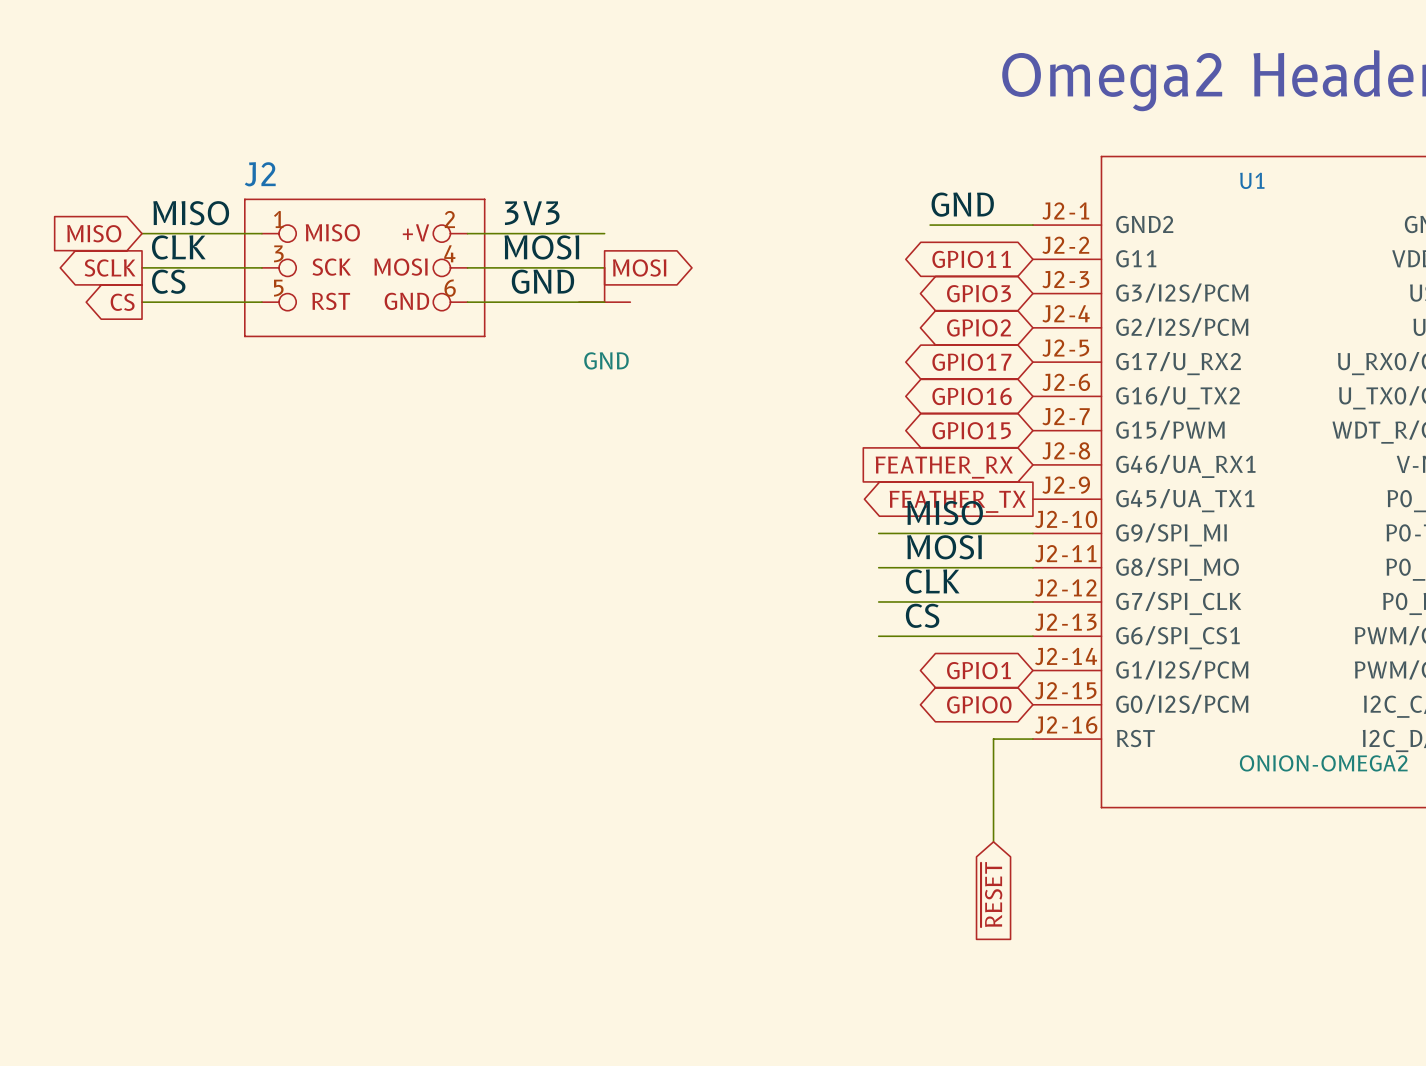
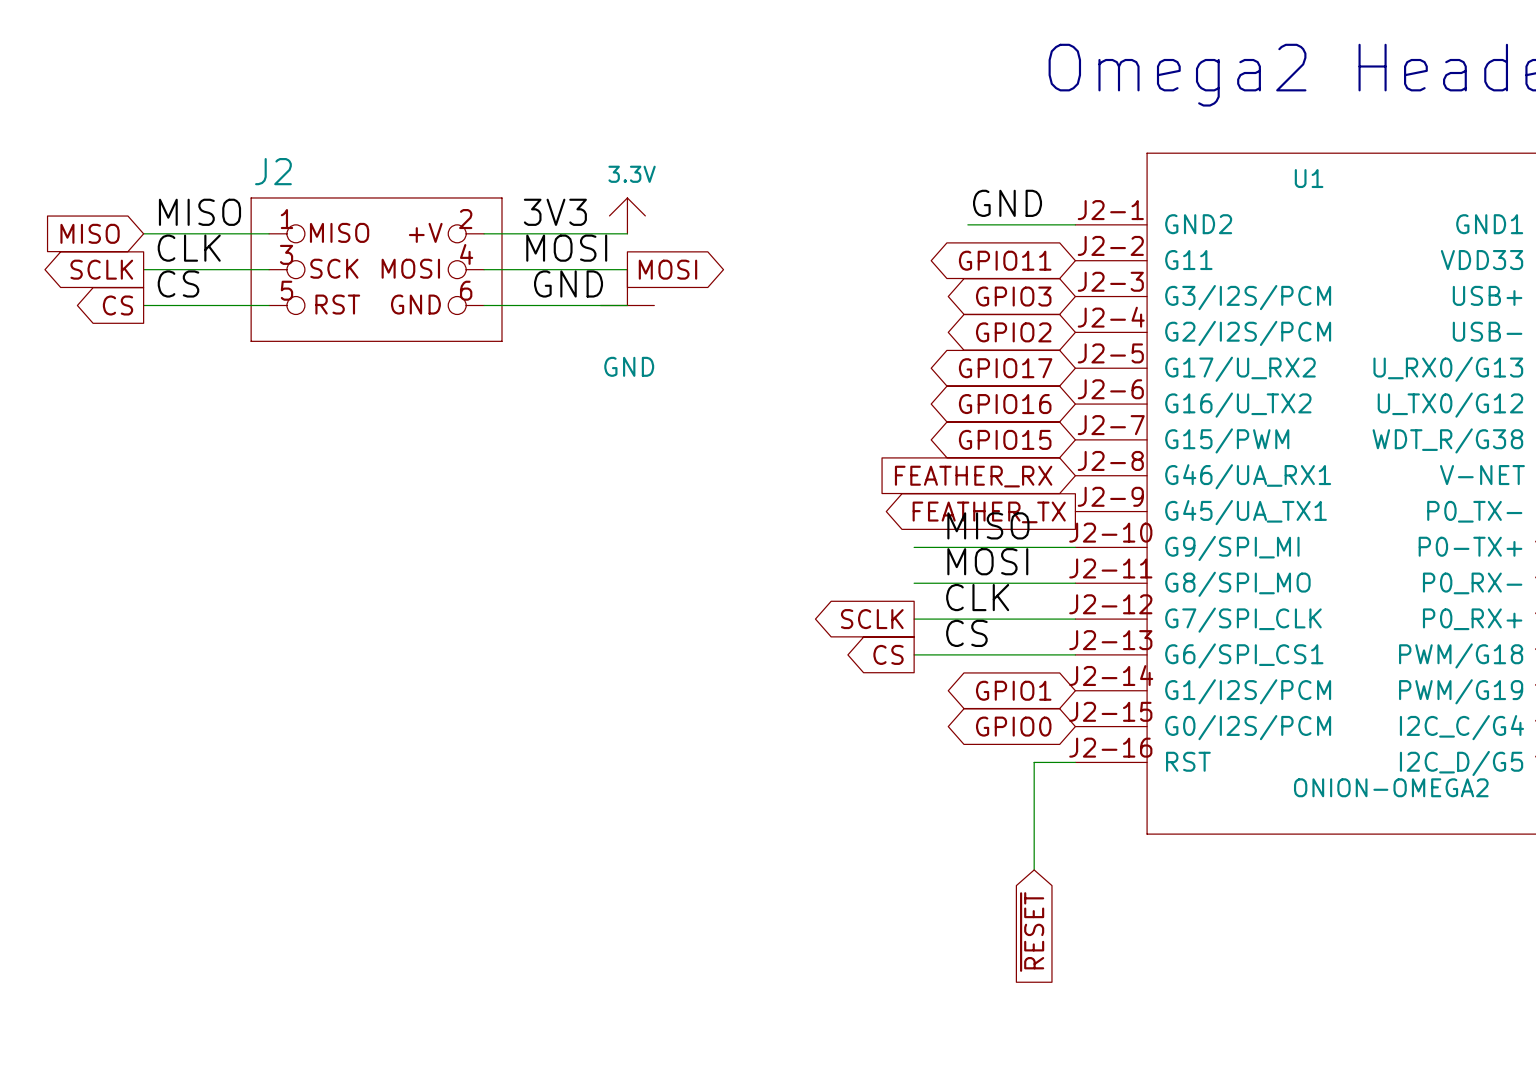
power symbol: none -> 3.3V (627, 215)
global label: none -> SCLK (872, 619)
global label: none -> CS (888, 654)

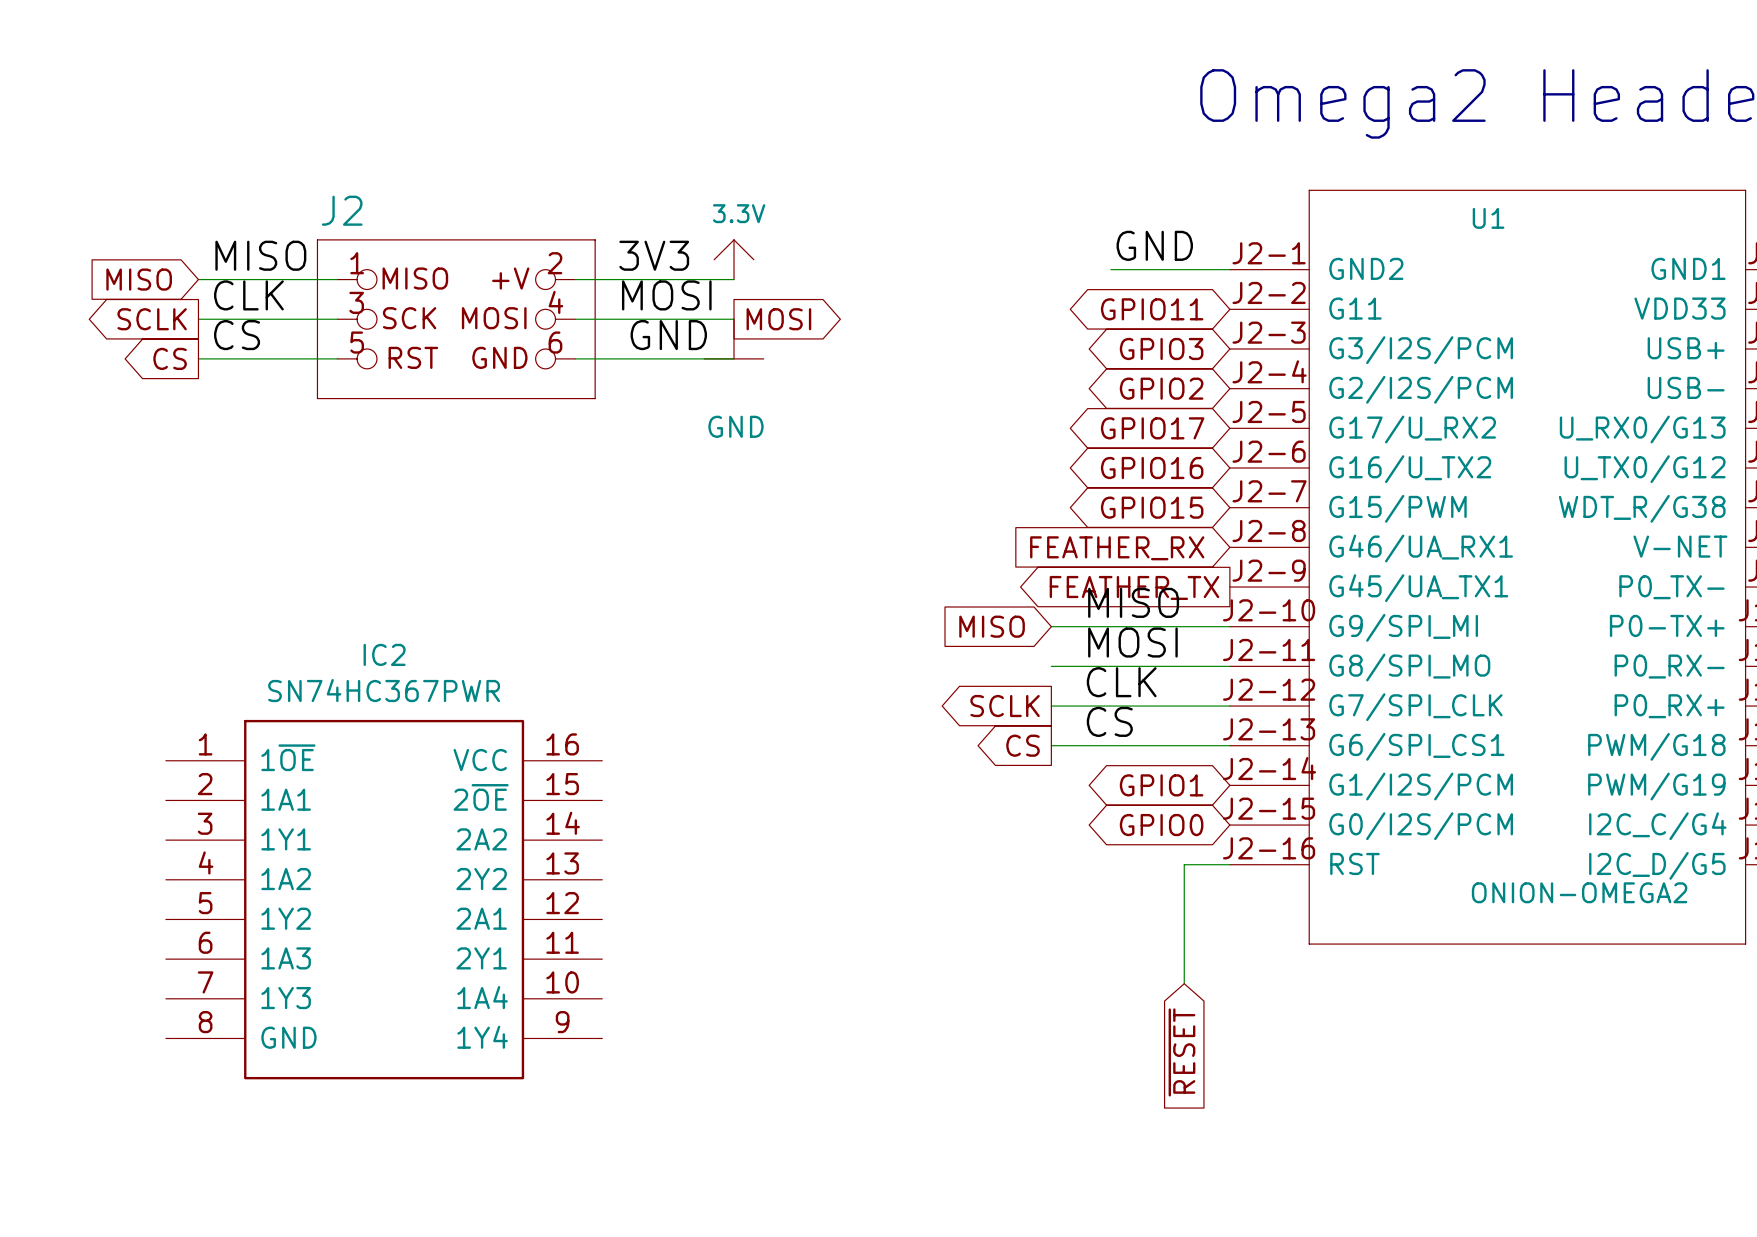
global label: none -> MISO (992, 626)
IC2: none -> SN74HC367PWR (384, 899)

